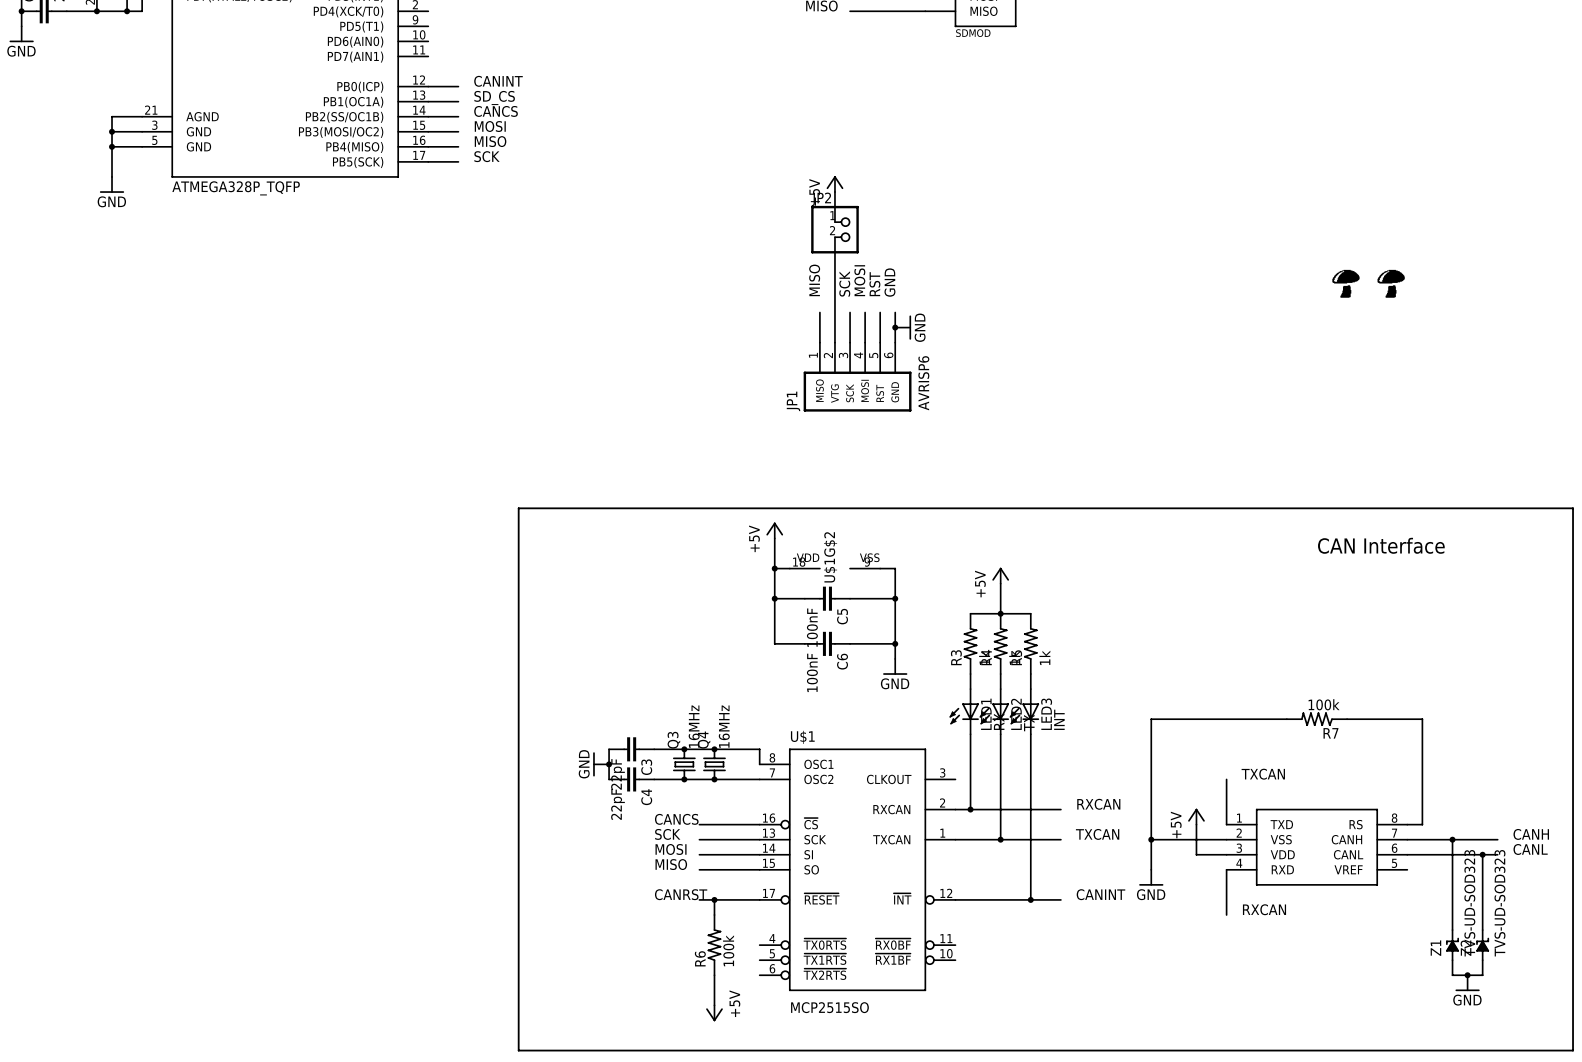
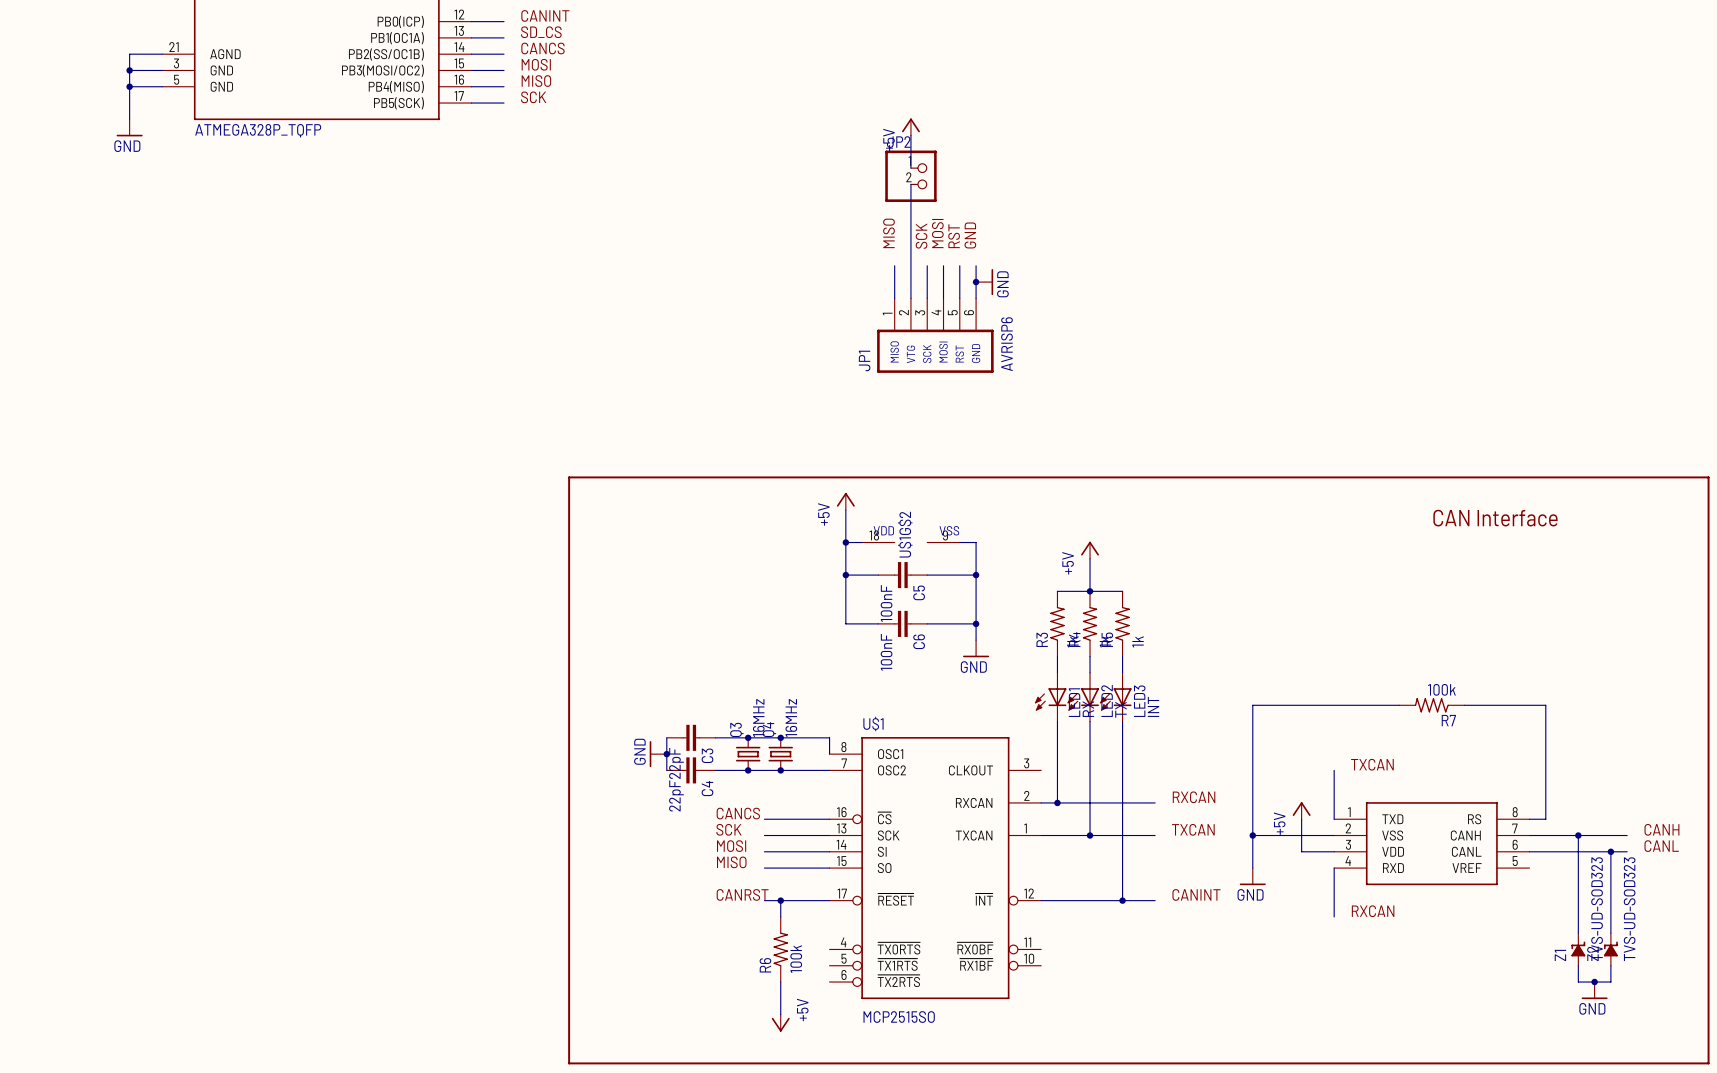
part: (1345, 283) -> none
part: (1391, 283) -> none

